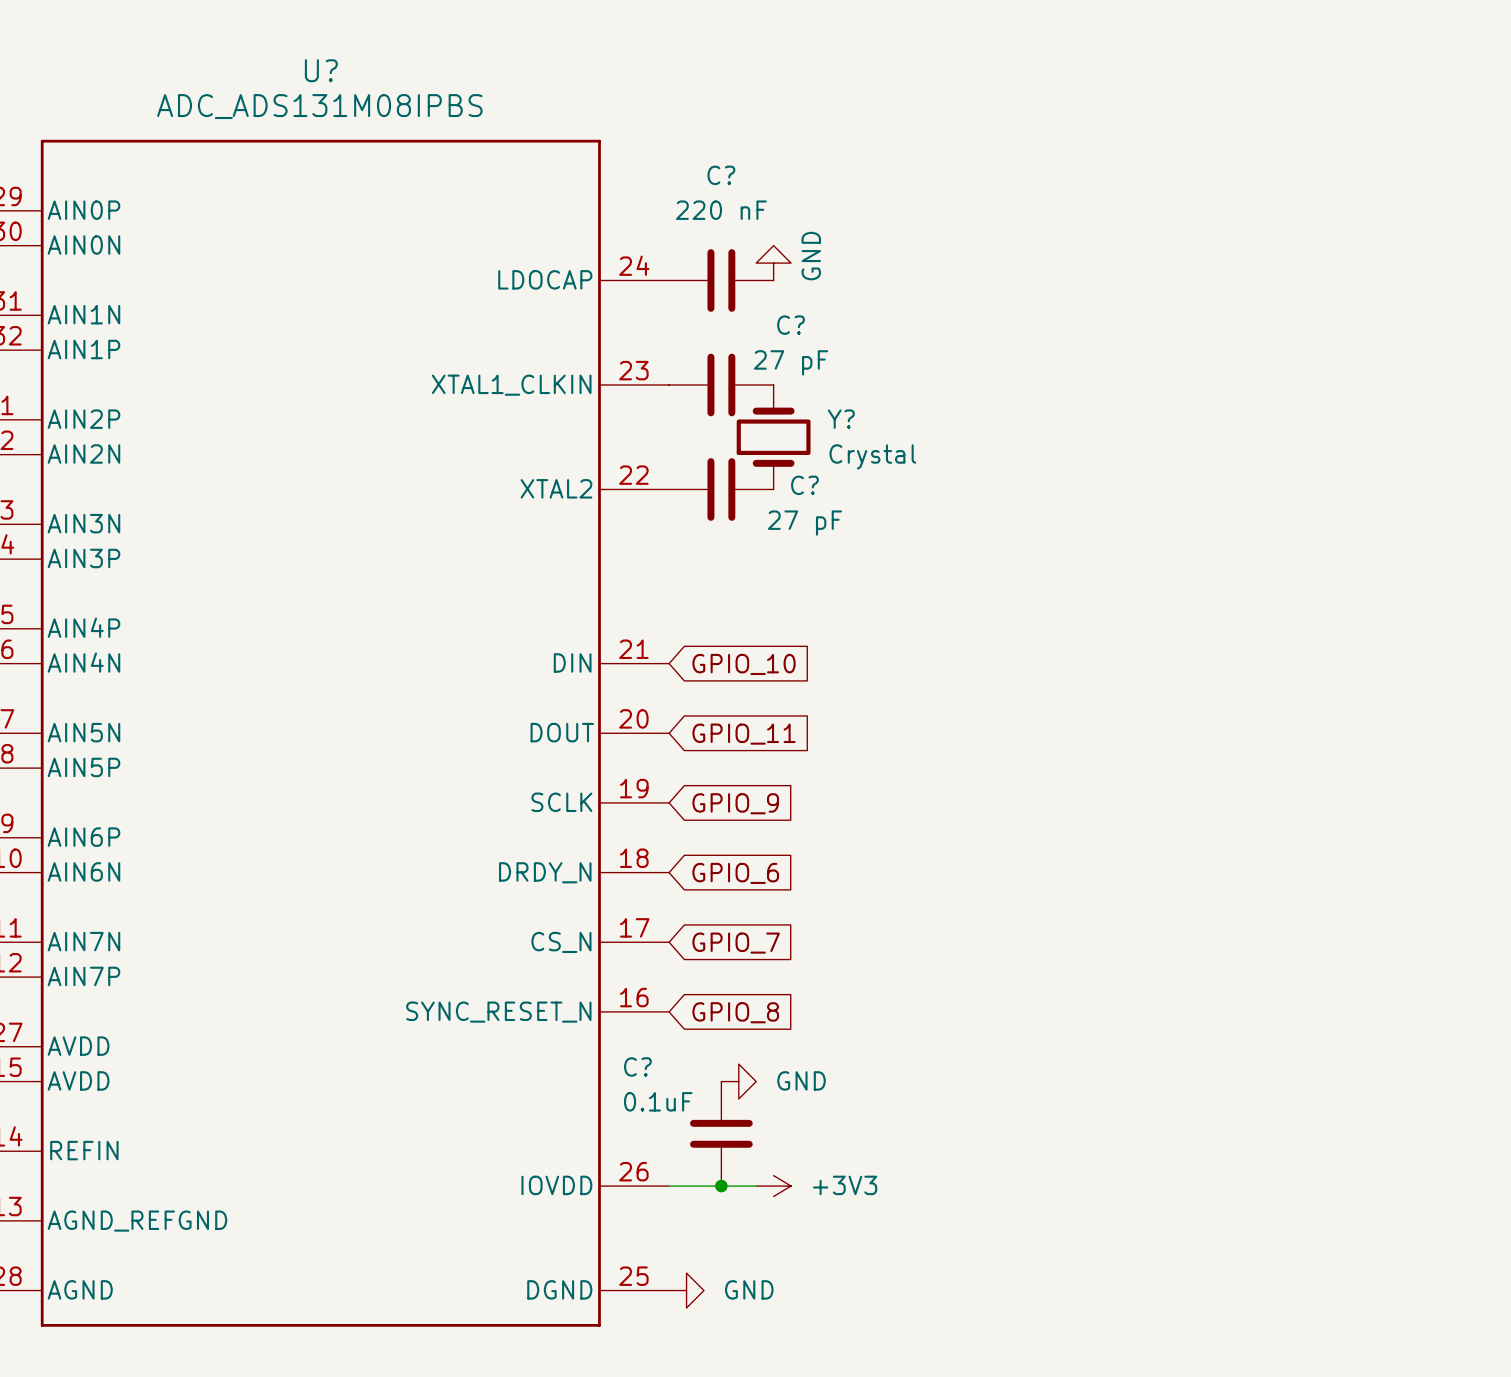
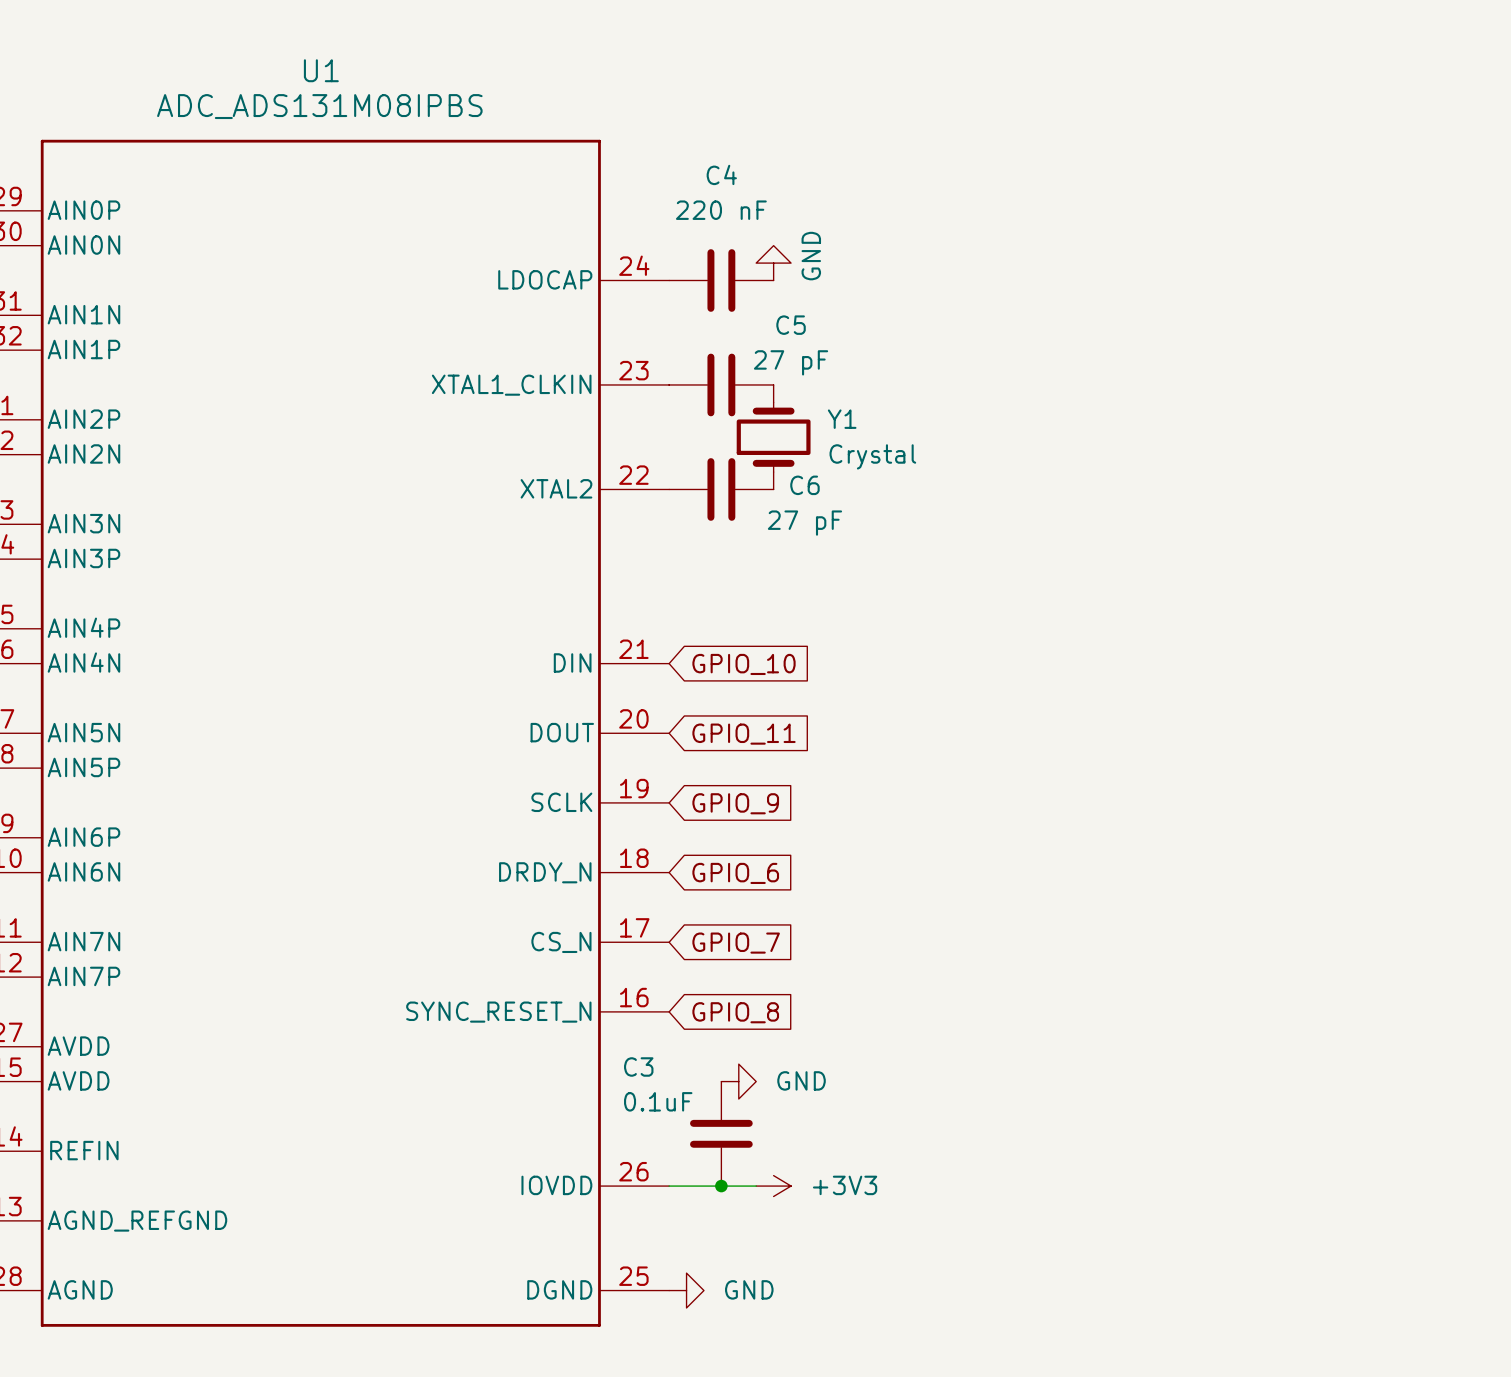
U? name: U? (321, 70) -> U1 (321, 70)
C? name: C? (721, 175) -> C4 (721, 174)
C? name: C? (791, 325) -> C5 (791, 325)
Y? name: Y? (841, 419) -> Y1 (842, 419)
C? name: C? (804, 485) -> C6 (804, 485)
C? name: C? (637, 1066) -> C3 (638, 1066)

